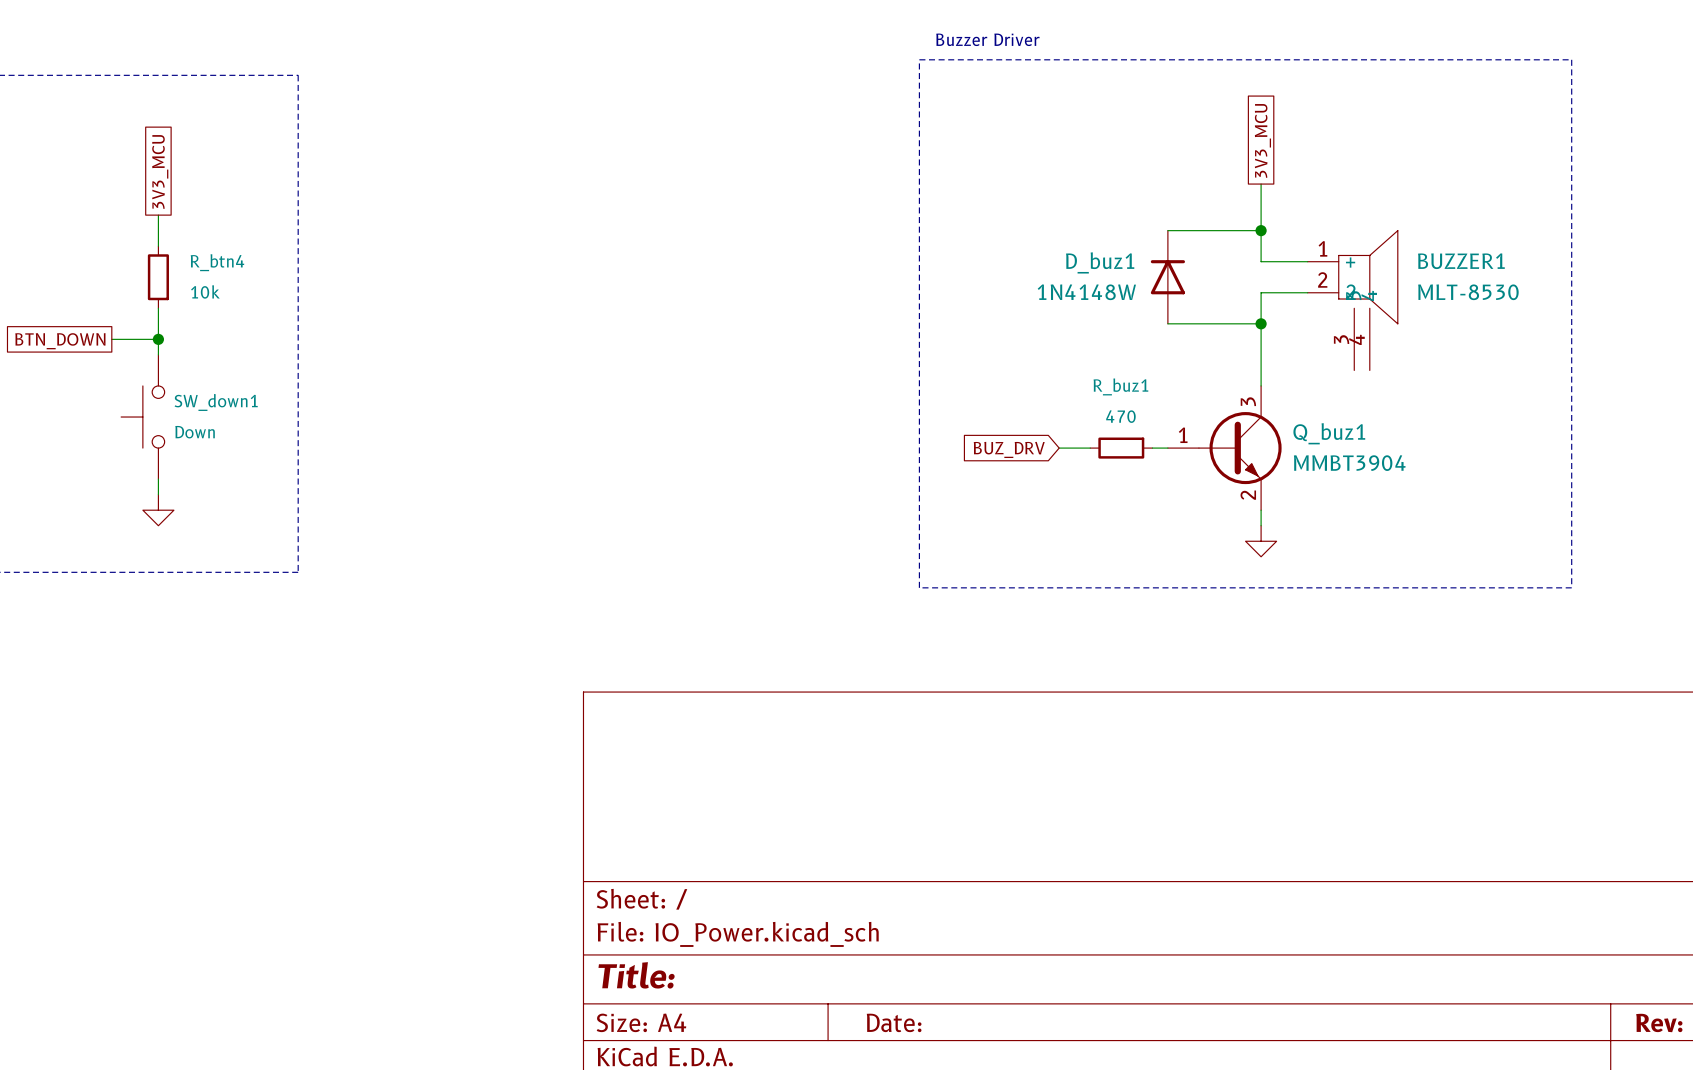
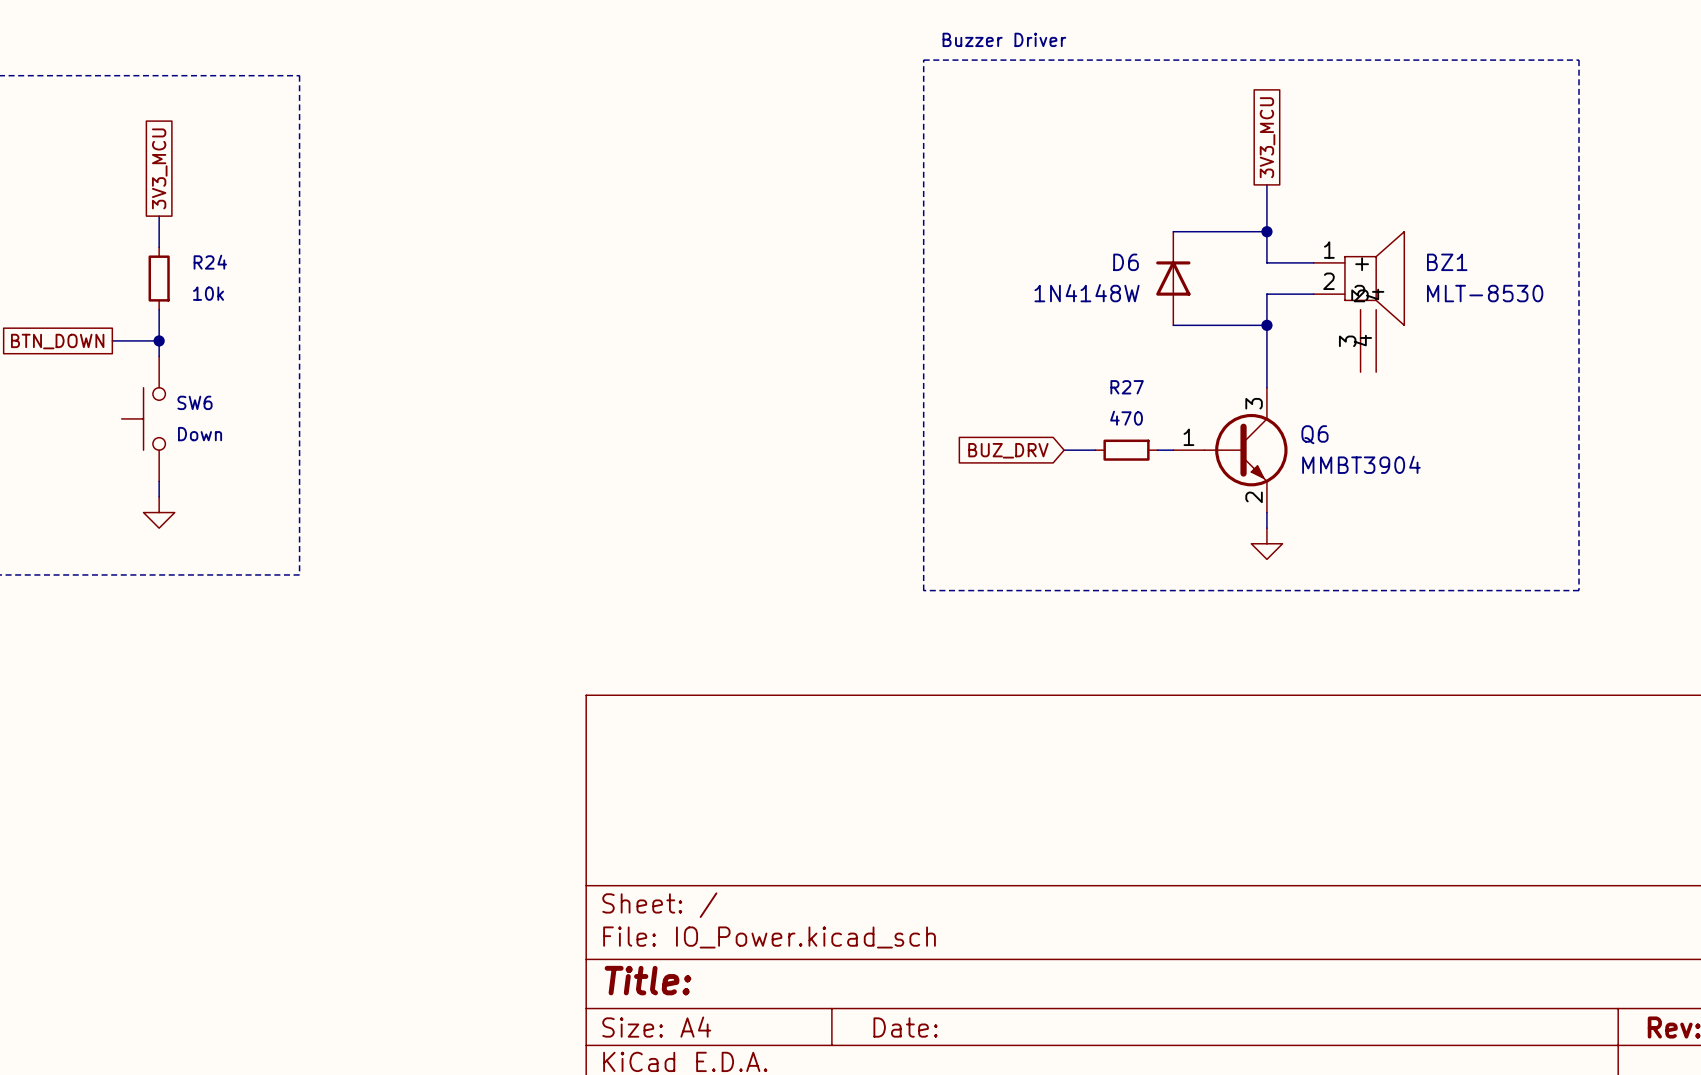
BUZZER1 name: BUZZER1 (1461, 261) -> BZ1 (1447, 262)
R_btn4 name: R_btn4 (217, 262) -> R24 (210, 262)
D_buz1 name: D_buz1 (1100, 262) -> D6 (1126, 262)
R_buz1 name: R_buz1 (1120, 386) -> R27 (1127, 387)
SW_down1 name: SW_down1 (216, 402) -> SW6 (195, 402)
Q_buz1 name: Q_buz1 (1329, 433) -> Q6 (1314, 434)

